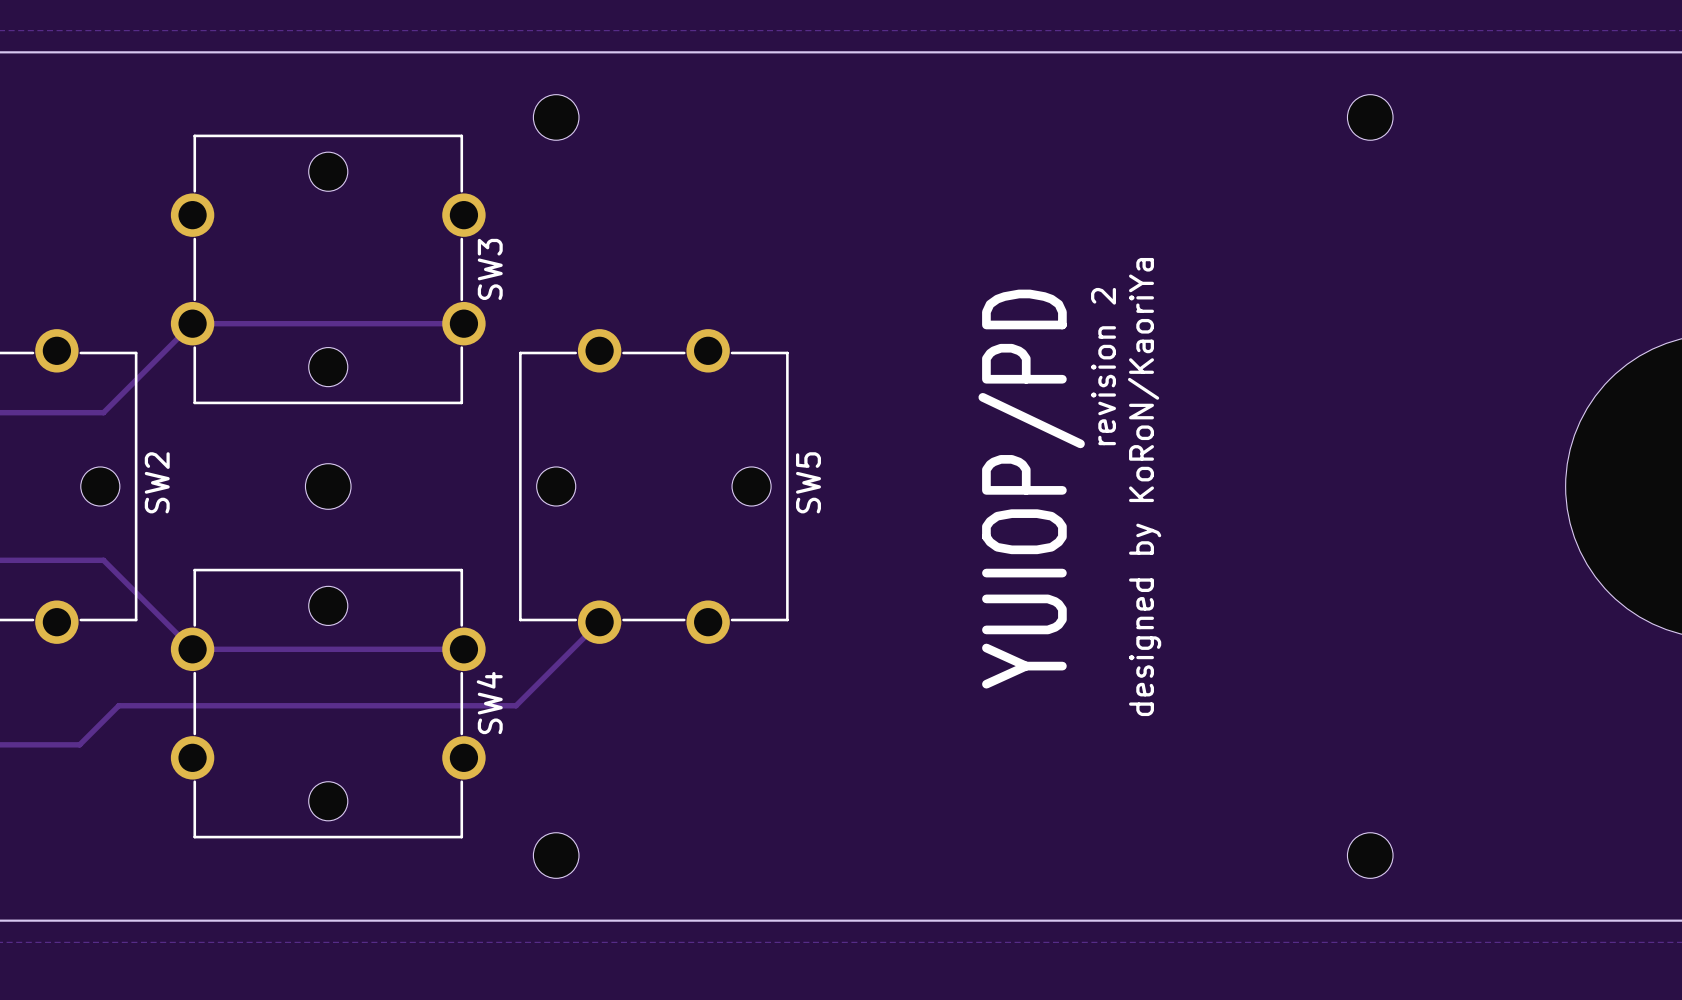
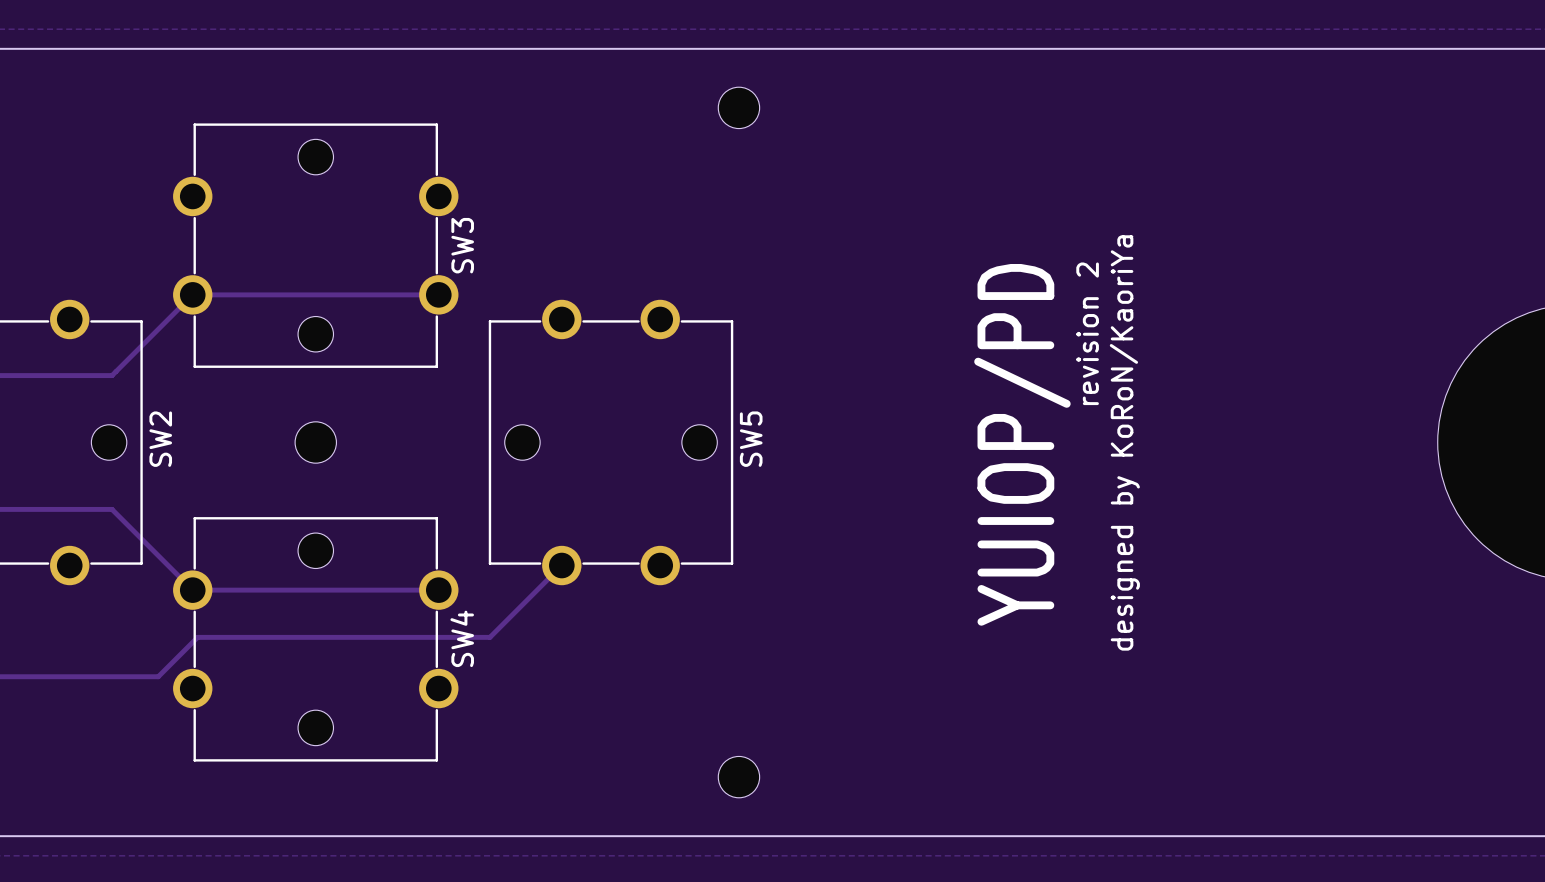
part position: (556, 117) -> (738, 107)
part: (1370, 117) -> none
text position: revision 2 (1103, 366) -> revision 2 (1087, 333)
text position: designed by KoRoN/KaoriYa (1144, 487) -> designed by KoRoN/KaoriYa (1124, 442)
text position: YUIOP/PD (1031, 489) -> YUIOP/PD (1022, 444)
track: (520, 701) (516, 705) (118, 705) (79, 744) -> (489, 637) (197, 637) (158, 676) (90, 676)
part position: (556, 855) -> (738, 777)
part: (1370, 855) -> none

